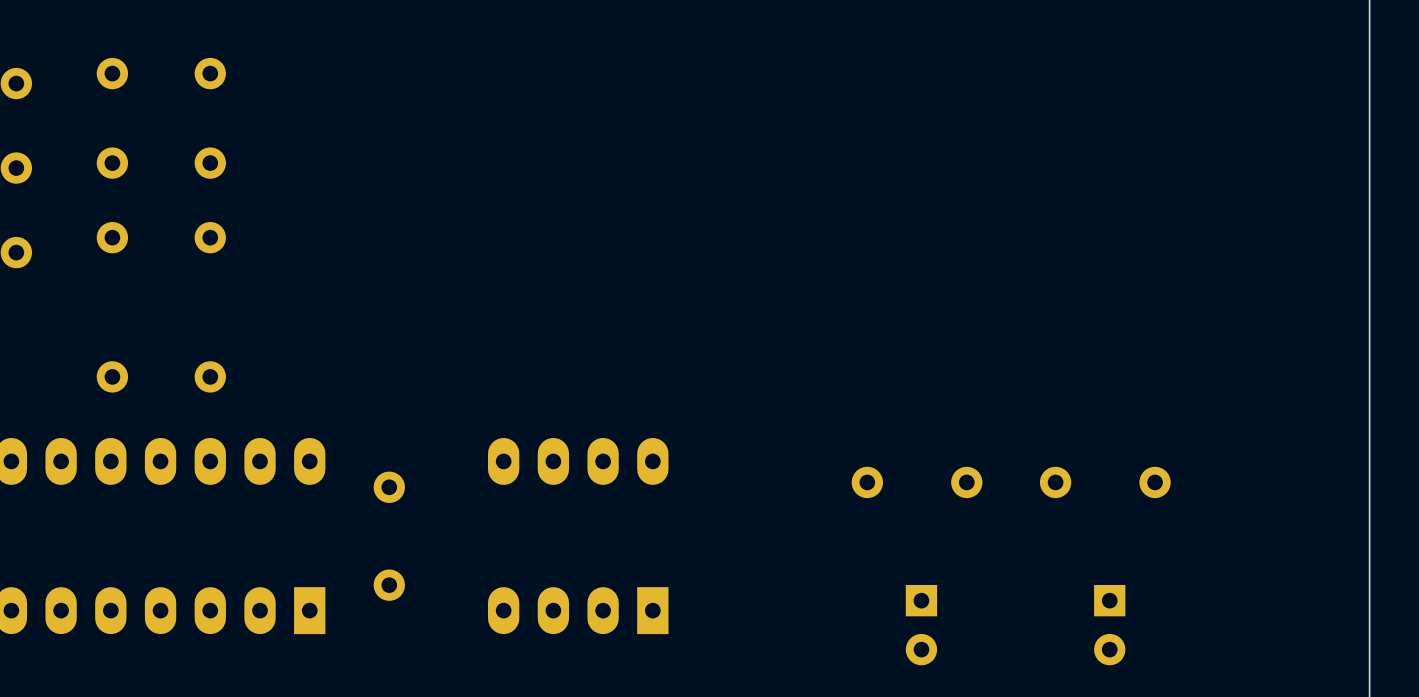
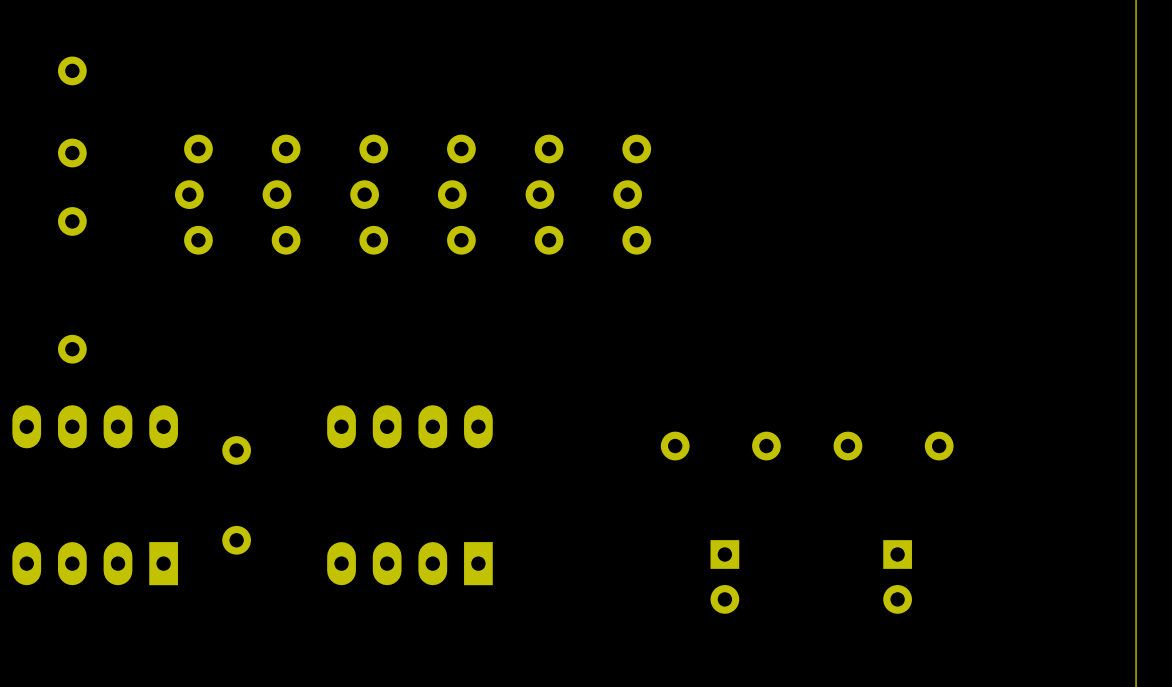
part: none -> (193, 194)
part: none -> (281, 194)
part: none -> (369, 194)
part: none -> (456, 194)
part: none -> (544, 194)
part: none -> (632, 194)

